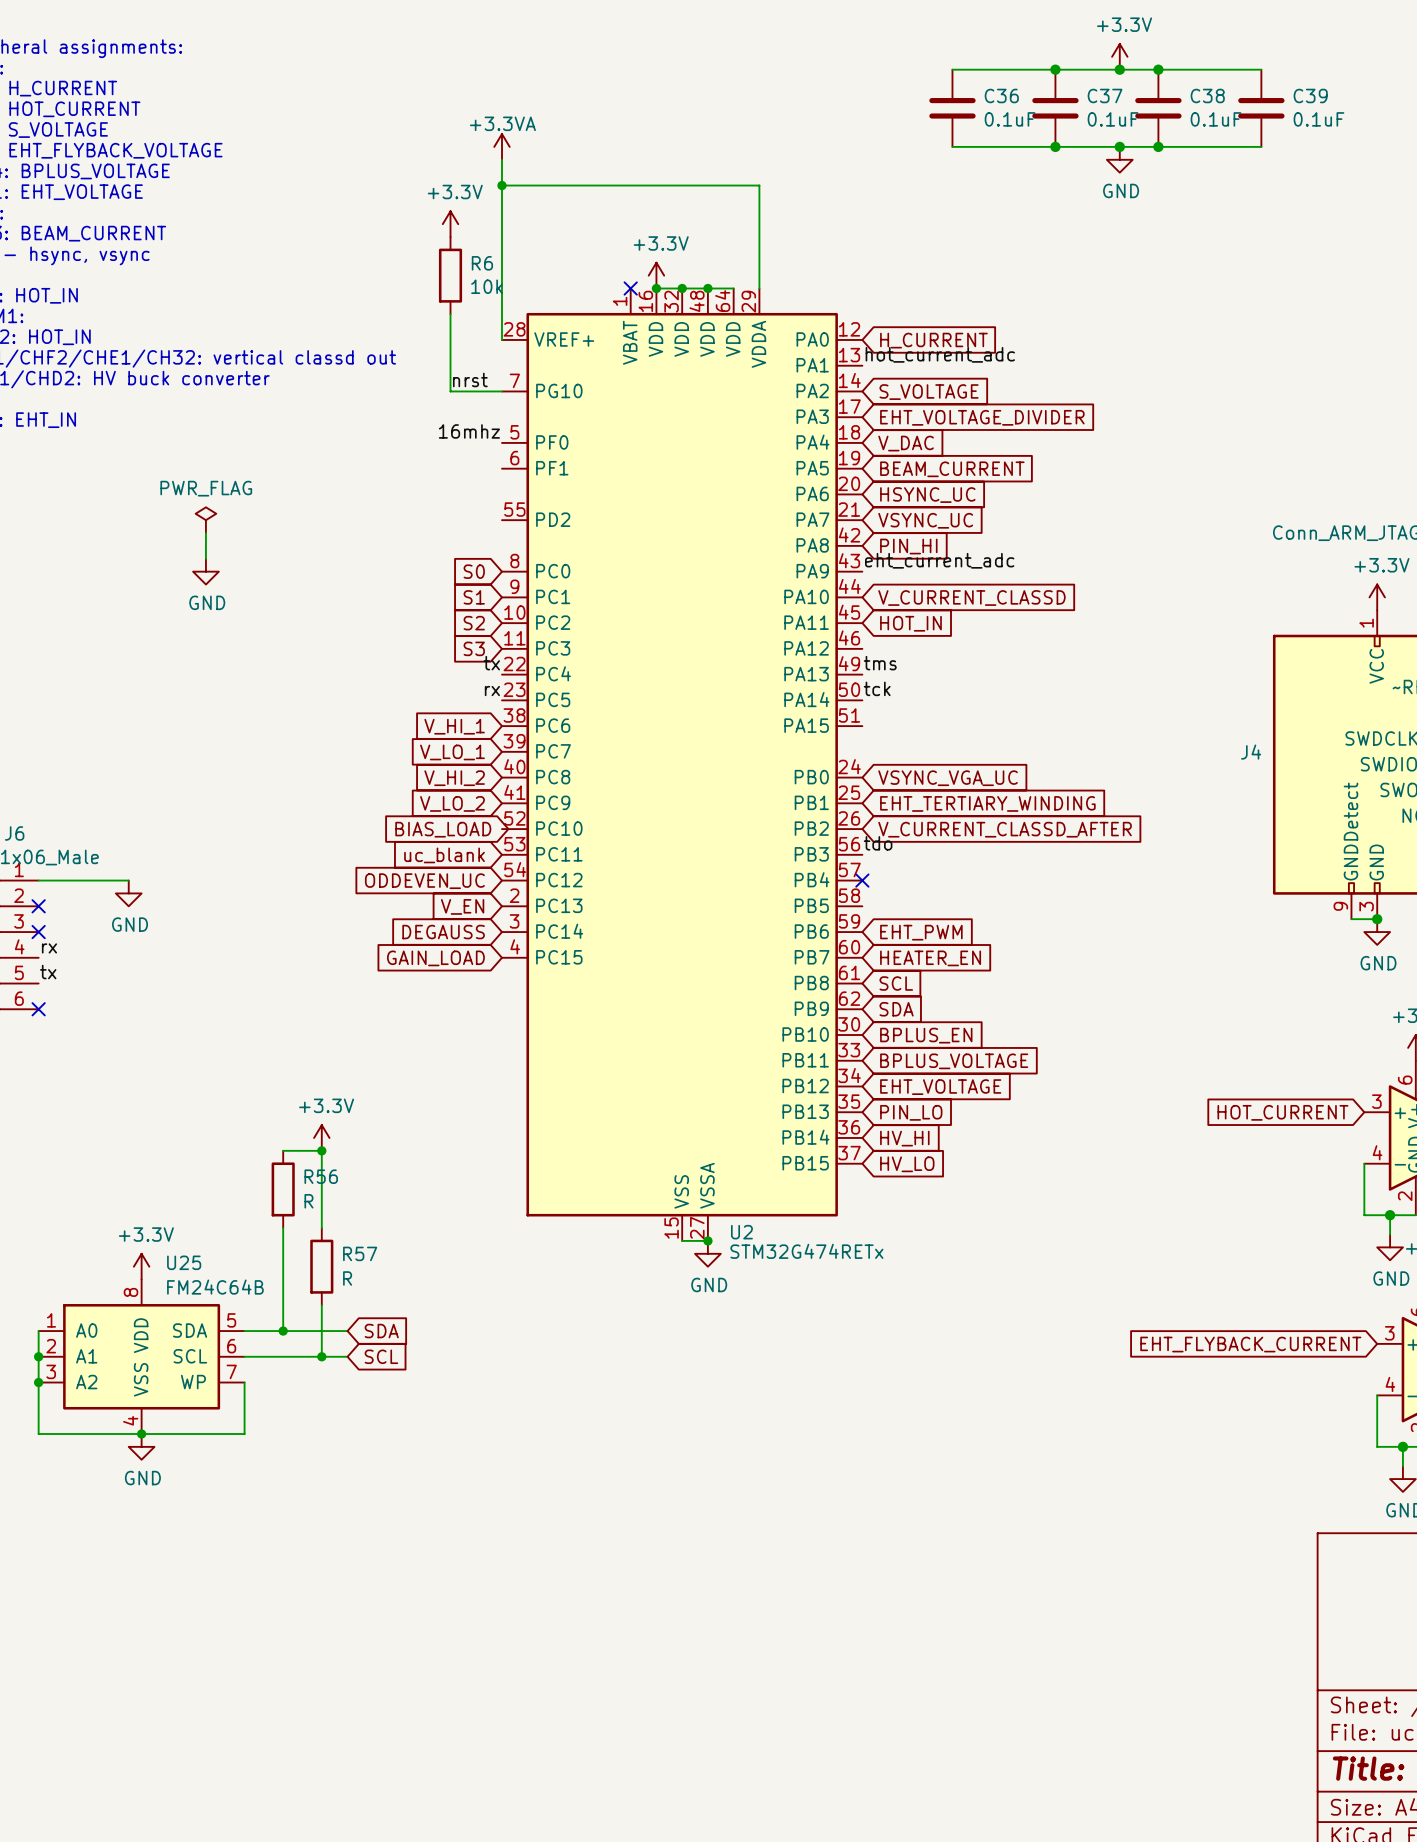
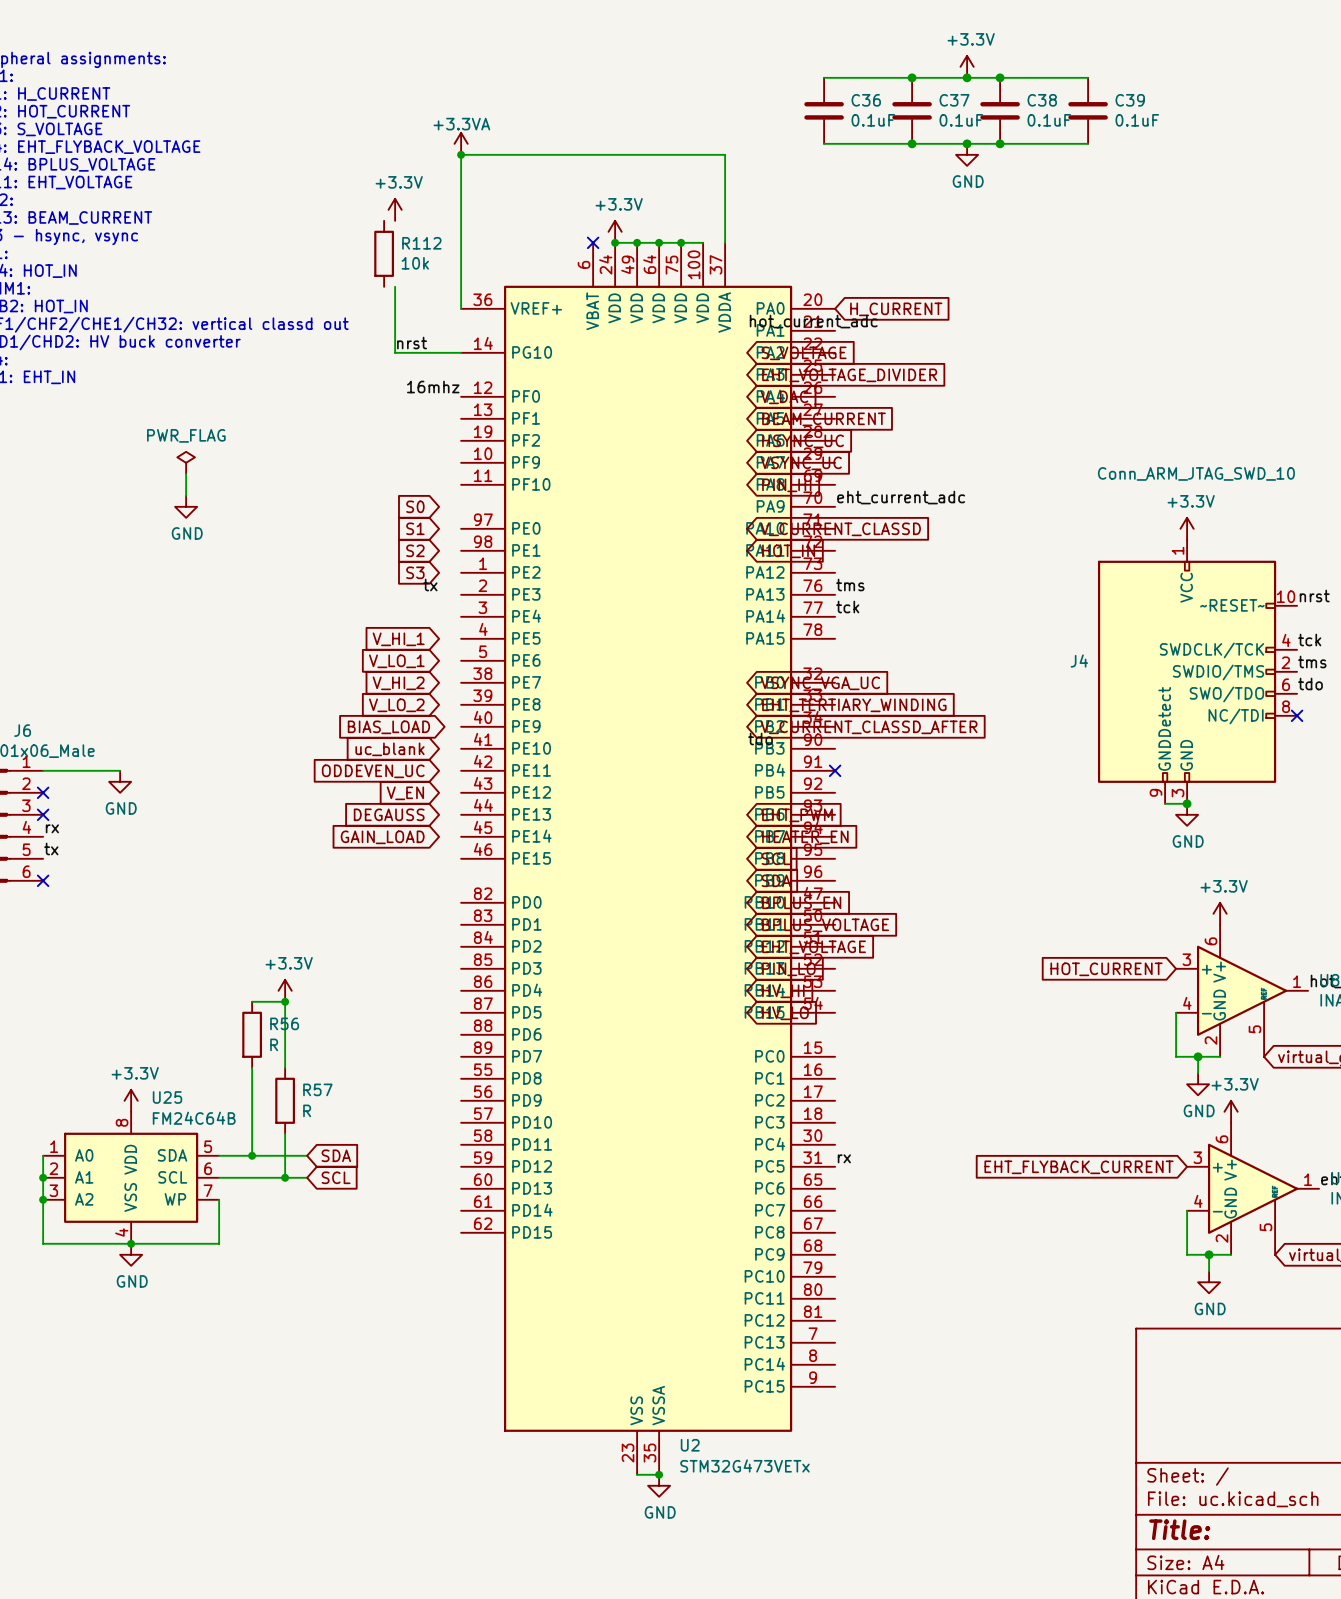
power symbol position: +3.3VA (501, 146) -> +3.3VA (461, 143)
wire: (501, 159) (501, 339) -> none
wire: (501, 185) (759, 185) (759, 288) -> none
junction position: (501, 185) -> (461, 154)
wire: none -> (615, 242) (703, 242)
junction: none -> (615, 242)
junction: none -> (637, 242)
junction: none -> (659, 242)
junction: none -> (681, 242)
wire: none -> (725, 242) (725, 154) (461, 154) (461, 308)
R112: none -> 10k (384, 253)
R6: 10k (450, 275) -> none
power symbol position: +3.3V (656, 275) -> +3.3V (615, 231)
U2 symbol: [501, 288, 863, 1241] -> [461, 242, 836, 1475]
no-connect mark position: (630, 288) -> (593, 242)
wire: (656, 288) (733, 288) -> none
junction: (656, 288) -> none
junction: (682, 288) -> none
junction: (707, 288) -> none
global label position: H_CURRENT (933, 340) -> H_CURRENT (896, 309)
label position: 16mhz (469, 431) -> 16mhz (433, 387)
label position: eht_current_adc (939, 560) -> eht_current_adc (901, 497)
label position: tms (880, 663) -> tms (850, 585)
label position: tck (877, 688) -> tck (847, 607)
label: rx (492, 691) -> none
no-connect mark: (862, 880) -> none
no-connect mark: none -> (835, 770)
U2 name position: U2 (741, 1232) -> U2 (690, 1445)
junction: (707, 1240) -> none
U2 value: STM32G474RETx (806, 1251) -> STM32G473VETx (744, 1466)
power symbol: GND (707, 1253) -> none
label: none -> rx (844, 1158)
wire: none -> (637, 1474) (659, 1474)
junction: none -> (659, 1474)
power symbol: none -> GND (659, 1485)

